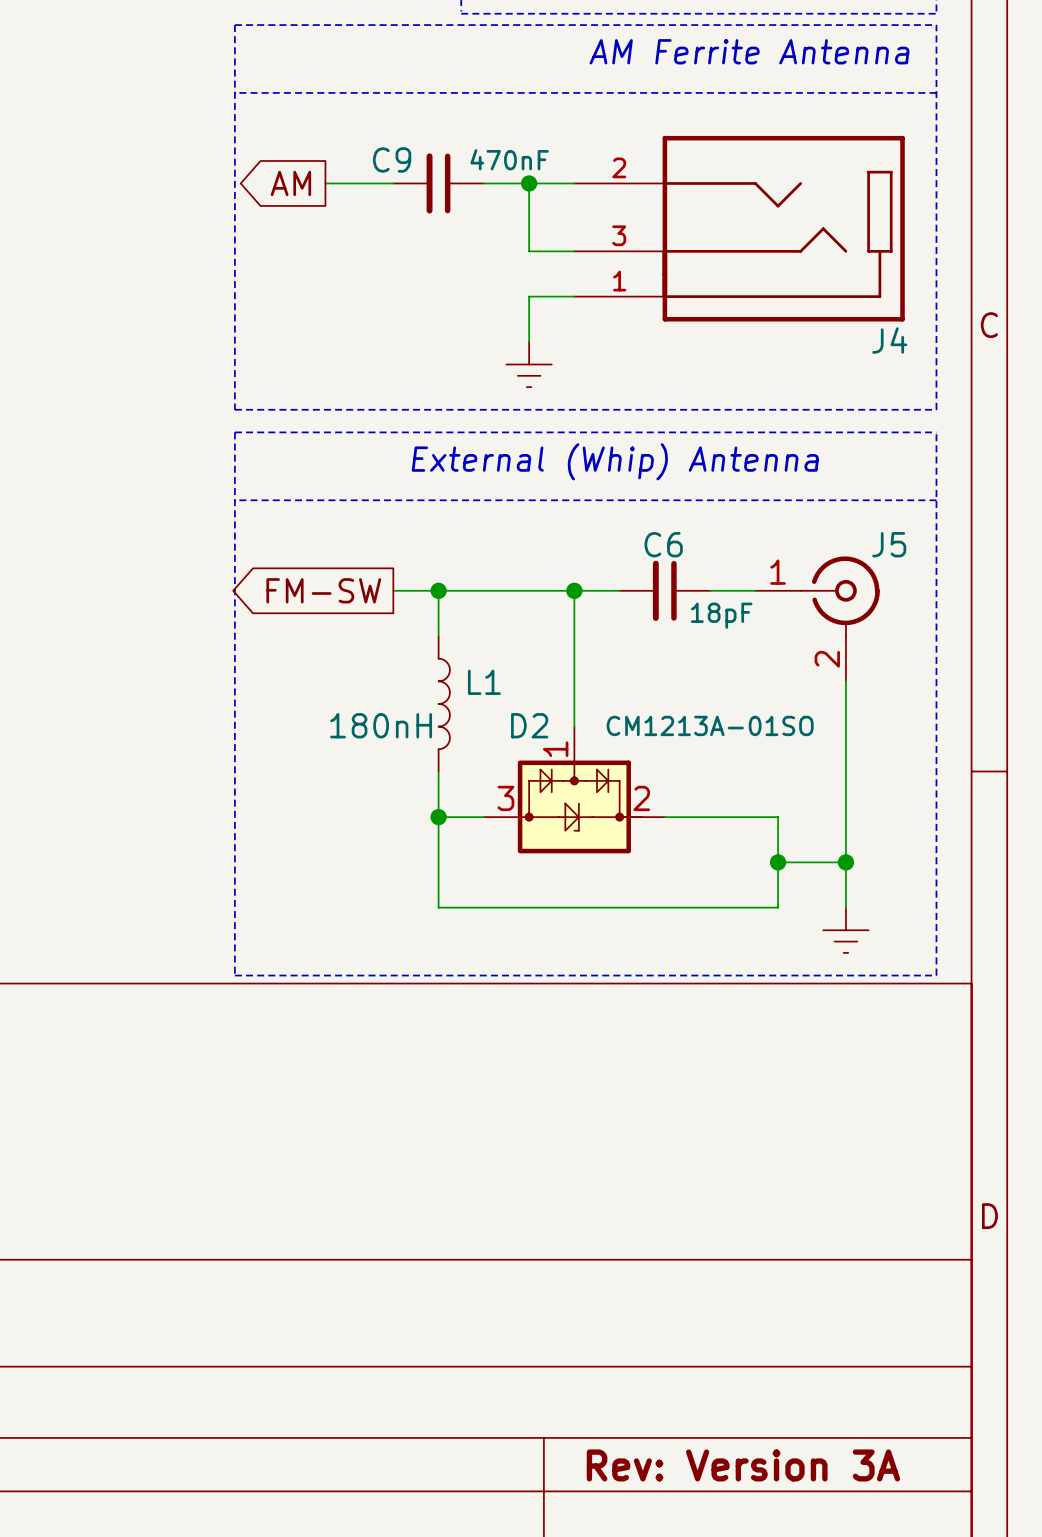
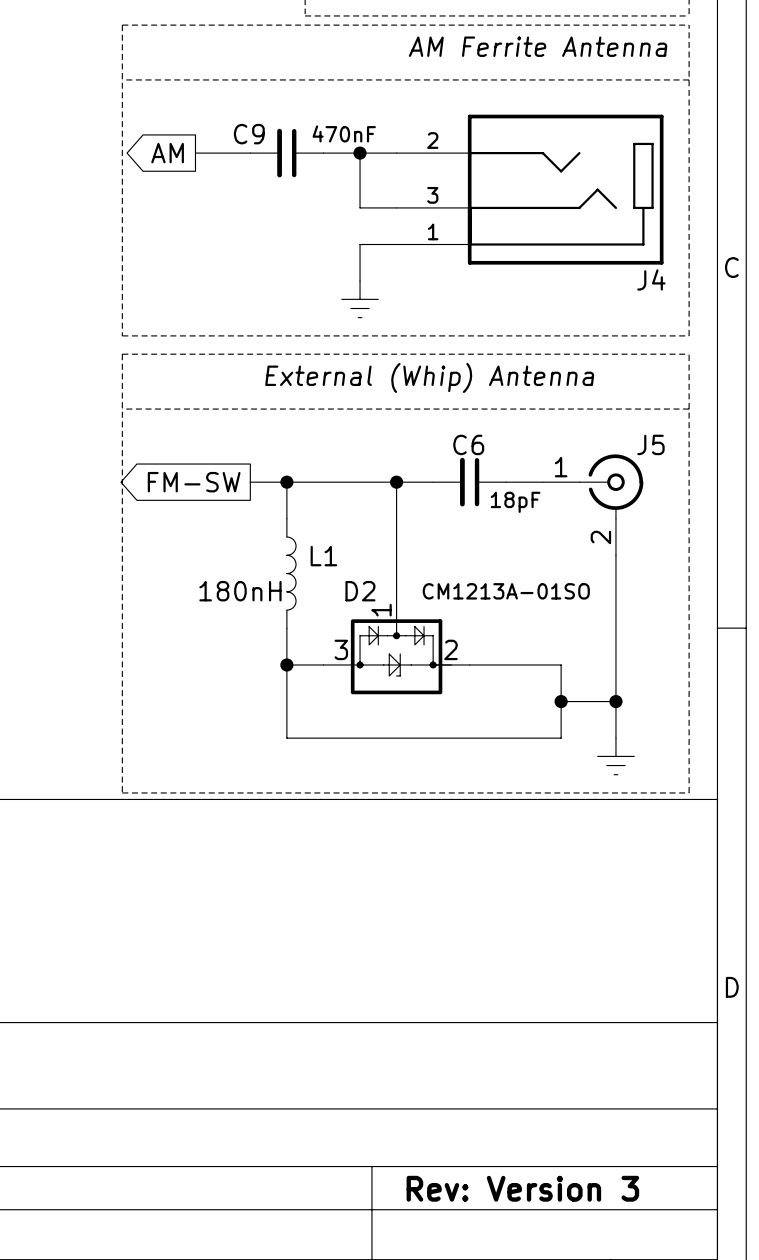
title block: Rev: Version 3A (743, 1465) -> Rev: Version 3 (522, 1188)

